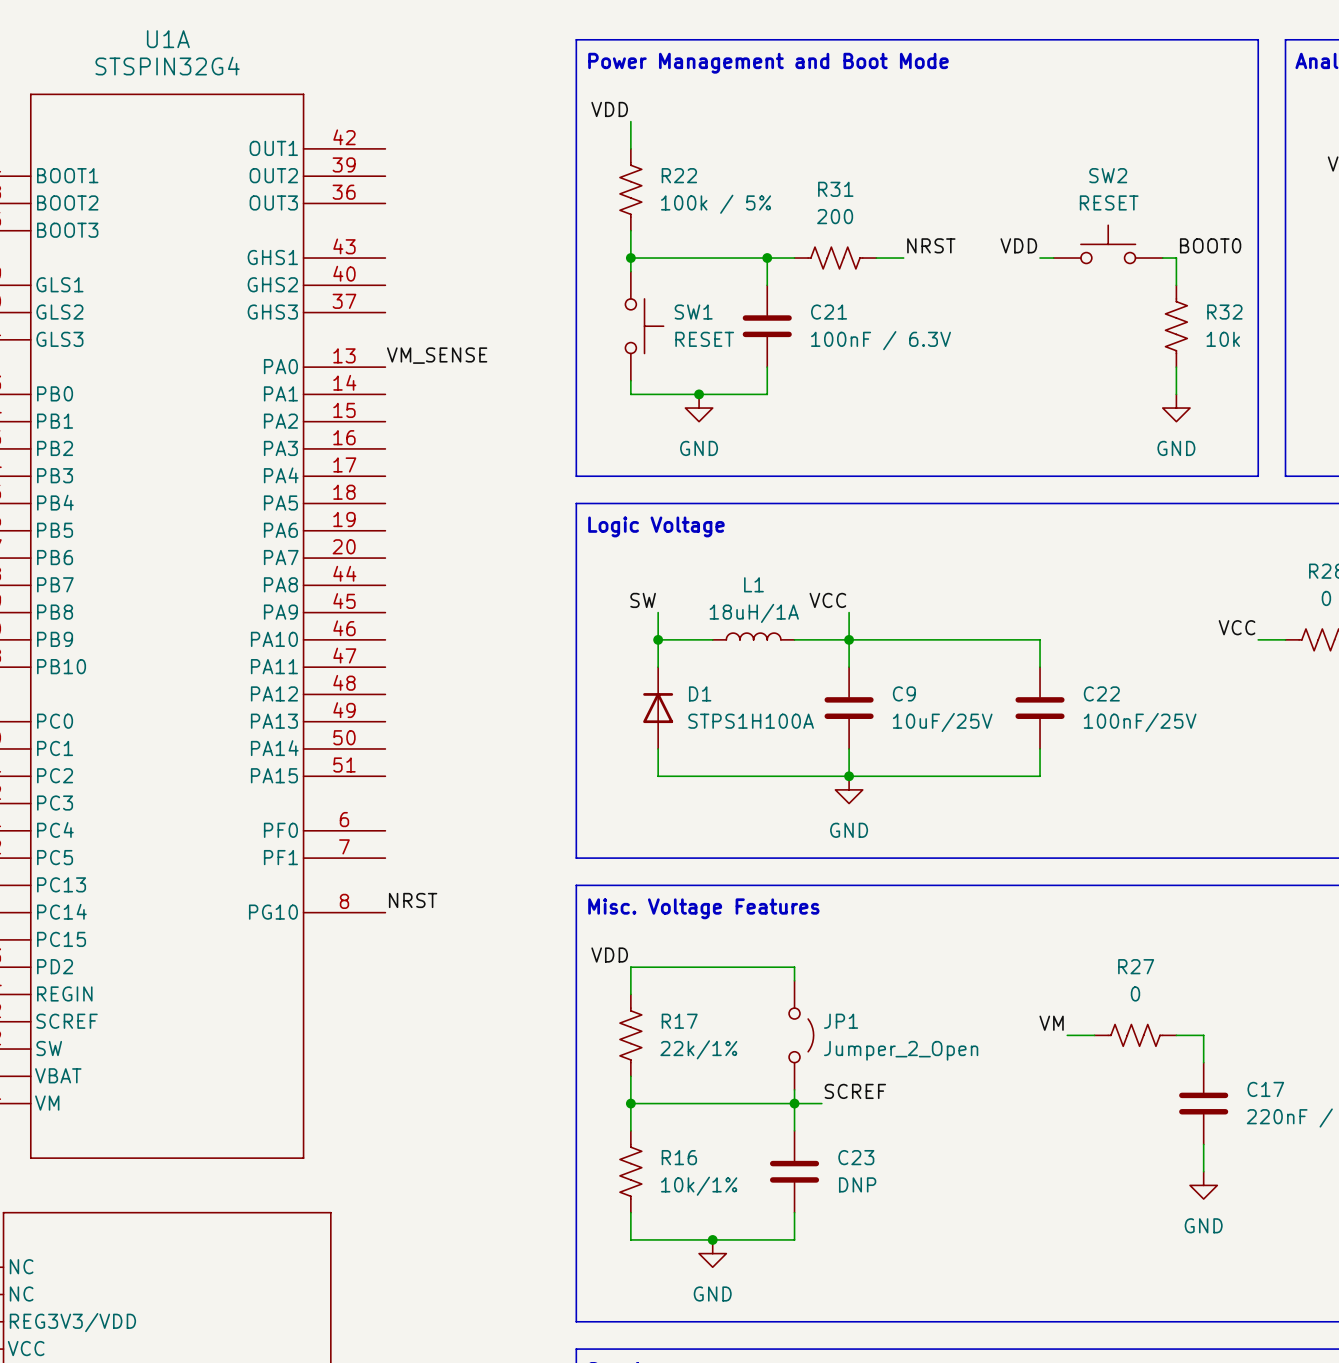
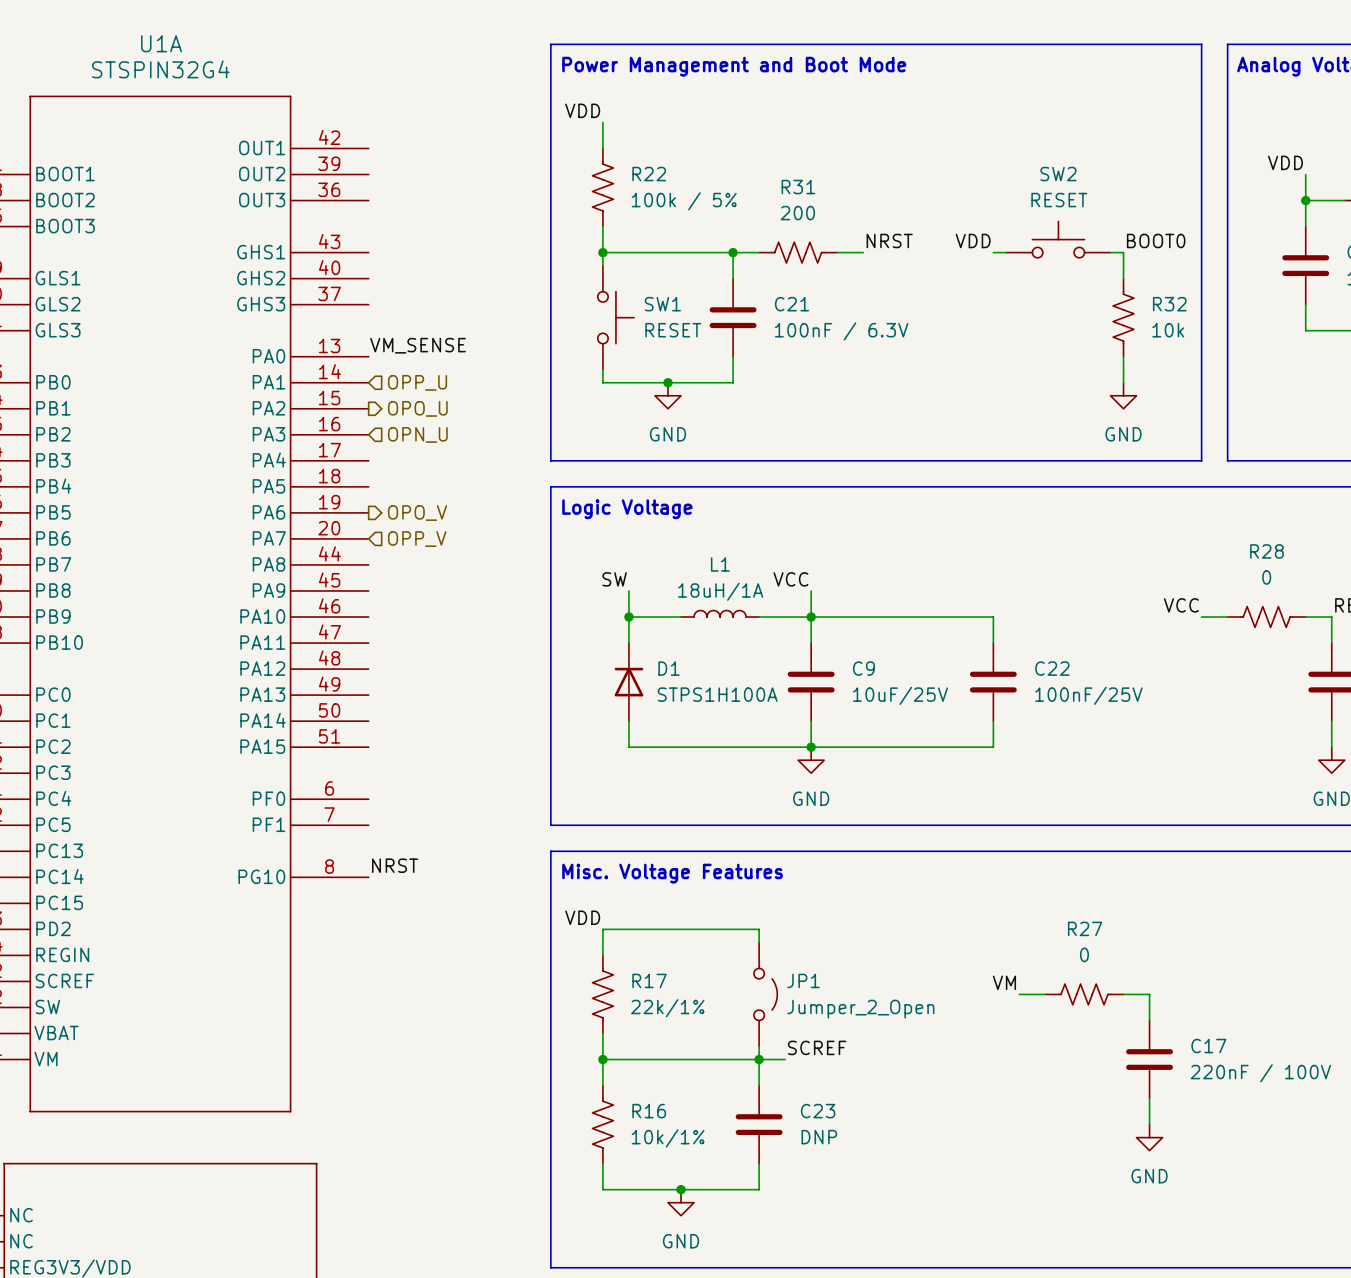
hierarchical label: none -> OPP_U (417, 382)
hierarchical label: none -> OPO_U (417, 408)
hierarchical label: none -> OPN_U (417, 434)
hierarchical label: none -> OPO_V (417, 513)
hierarchical label: none -> OPP_V (417, 539)

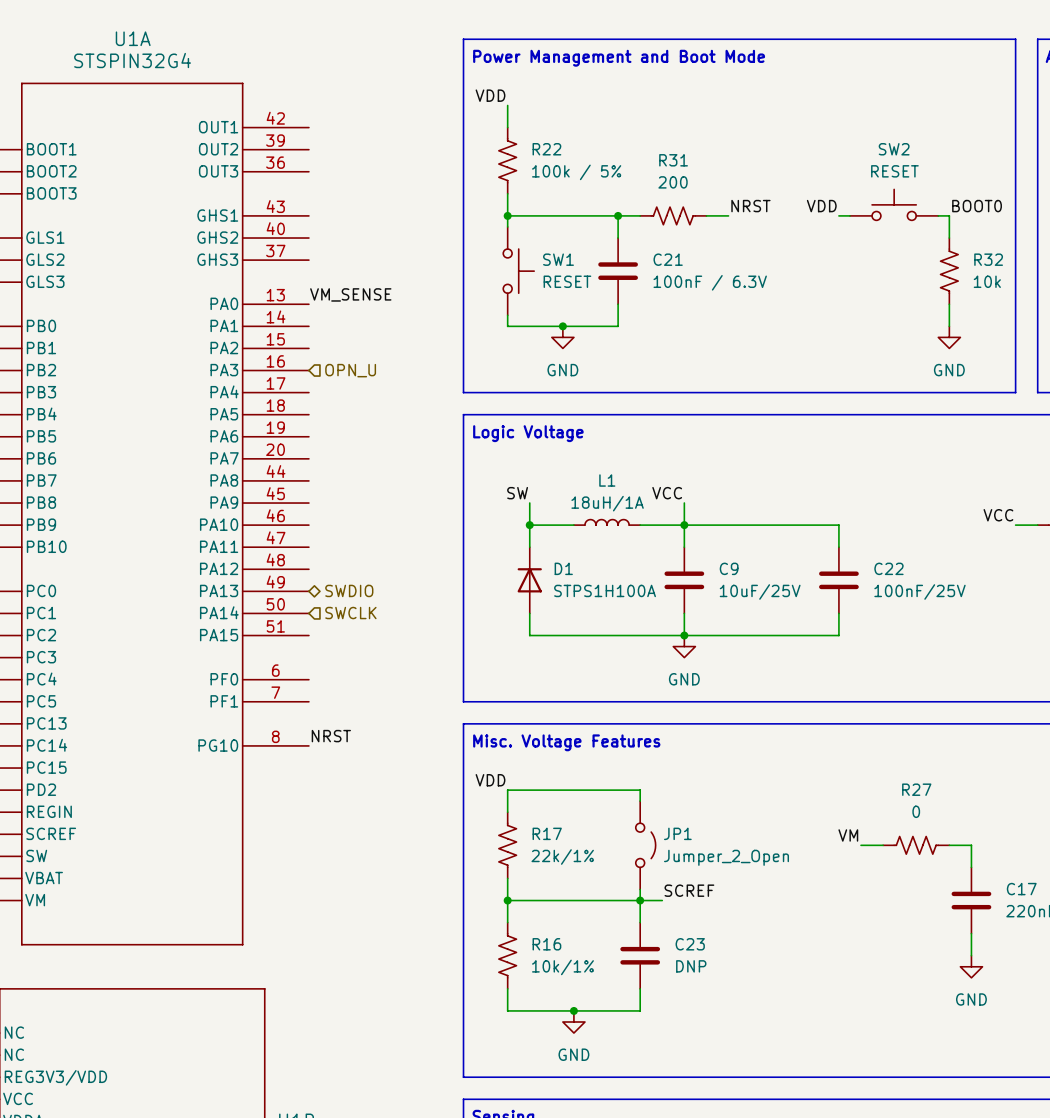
hierarchical label: OPP_U (417, 382) -> none
hierarchical label: OPO_U (417, 408) -> none
hierarchical label: OPO_V (417, 513) -> none
hierarchical label: OPP_V (417, 539) -> none
hierarchical label: none -> SWDIO (349, 590)
hierarchical label: none -> SWCLK (350, 613)

